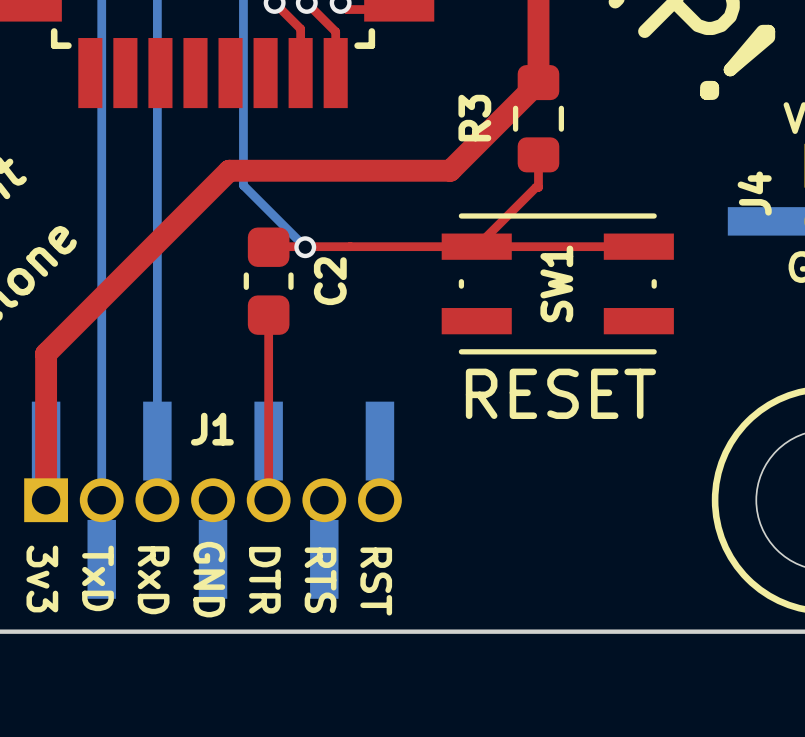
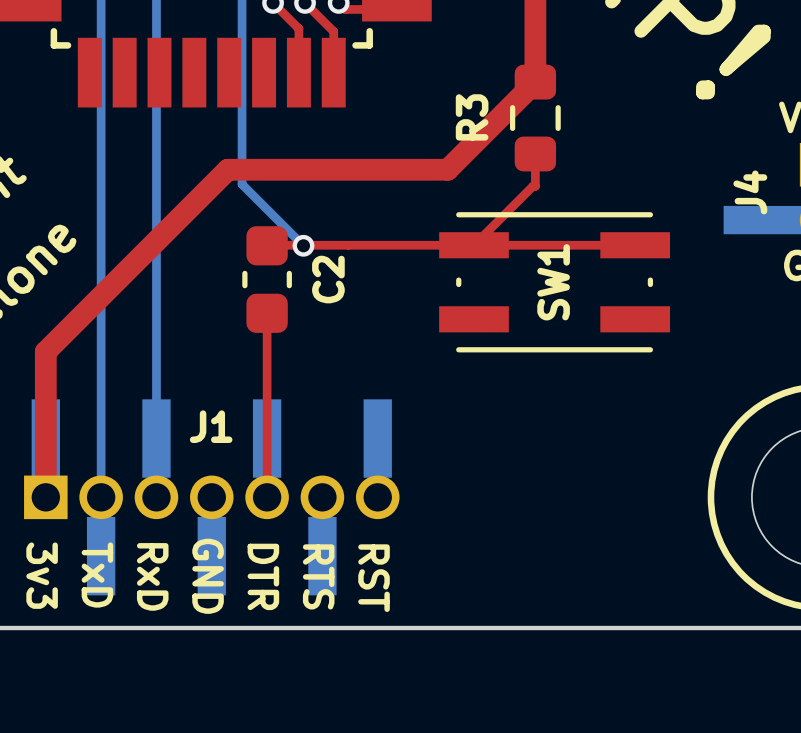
text: RESET (560, 393) -> none

